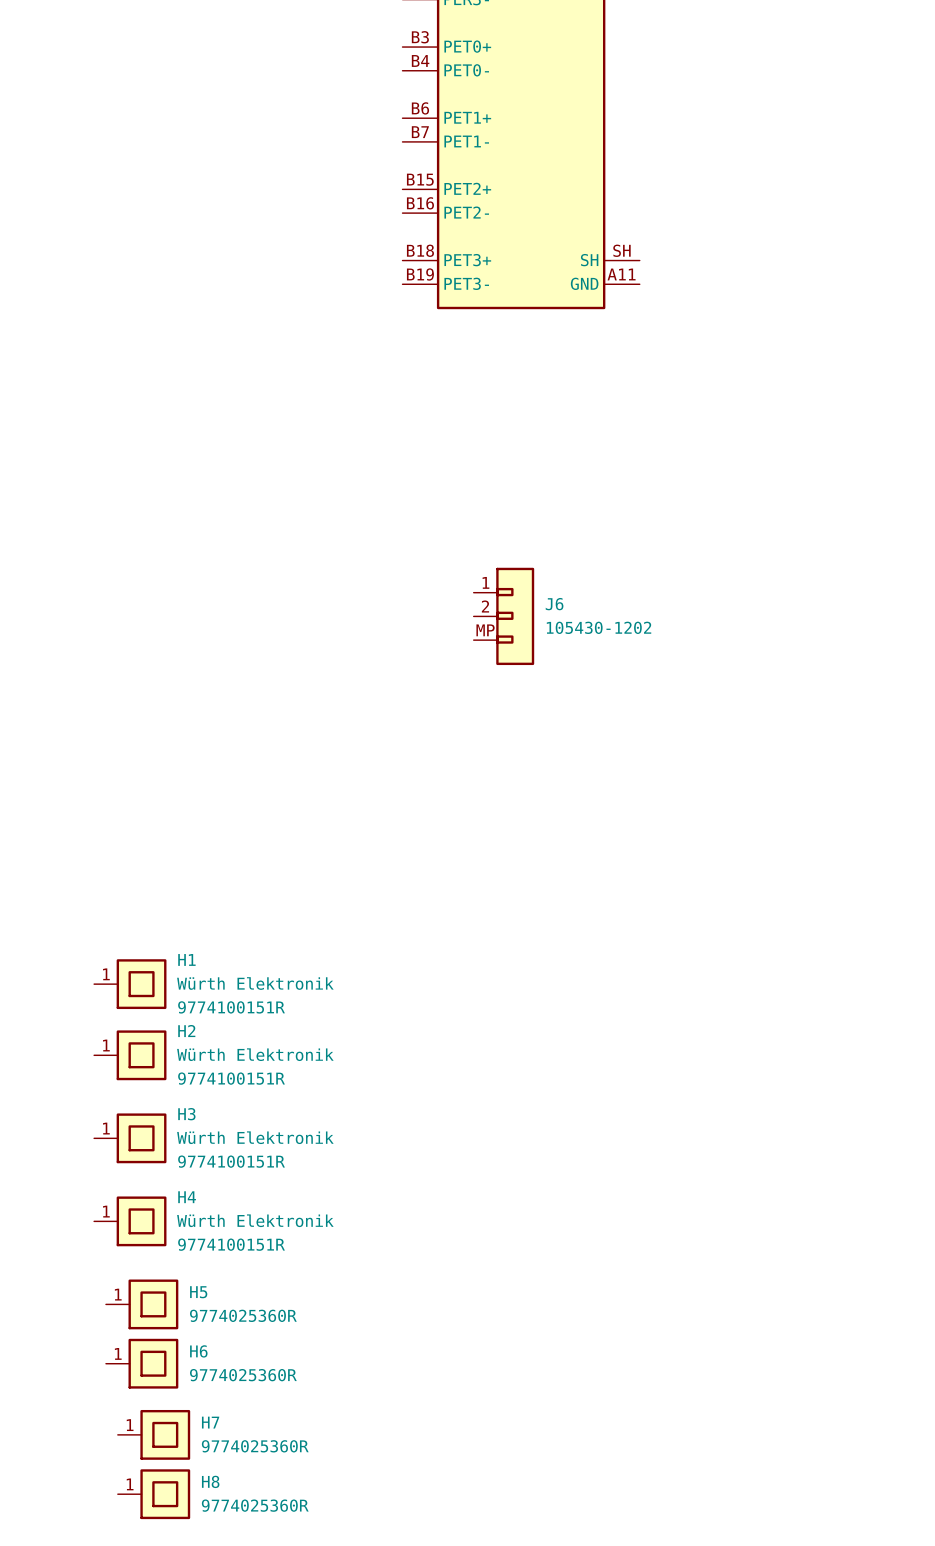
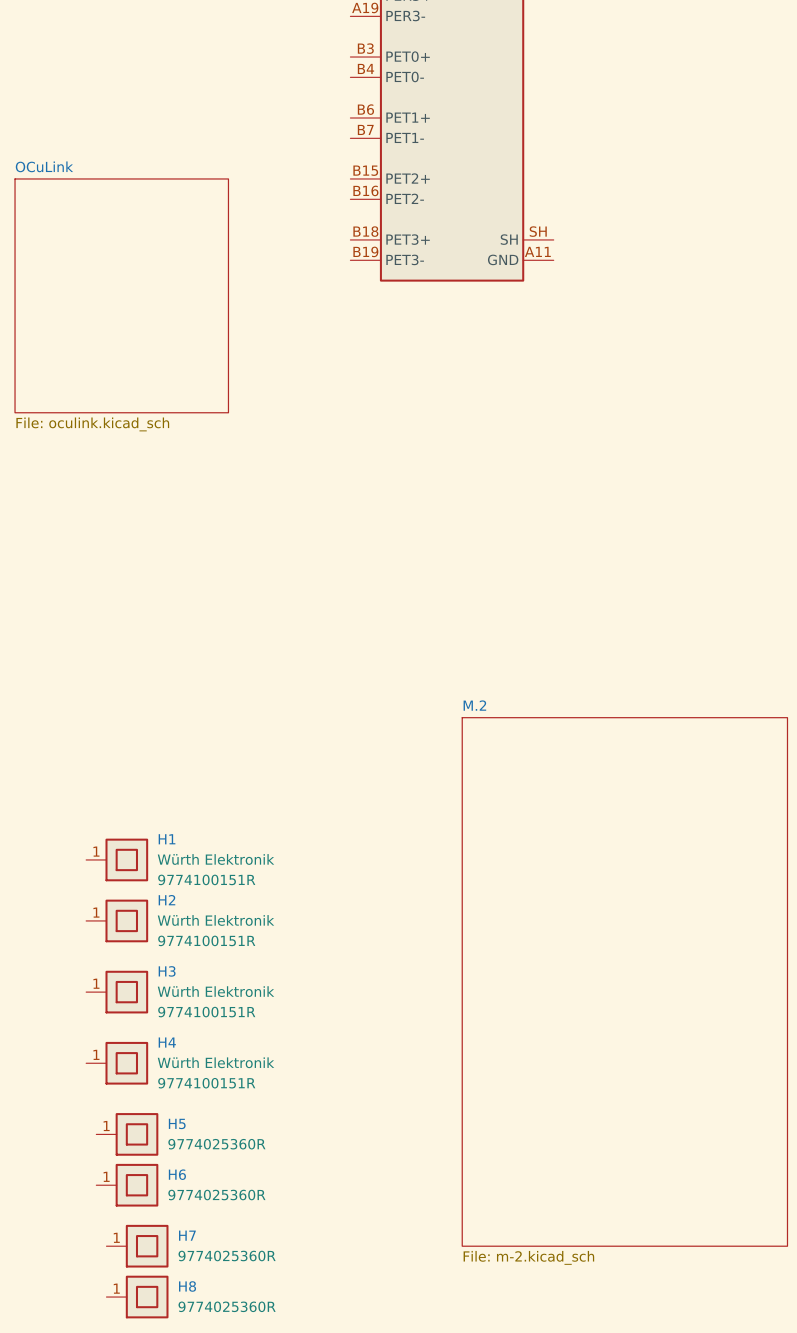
sheet OCuLink: none -> File: oculink.kicad_sch (121, 295)
J6: (503, 616) -> none
sheet M.2: none -> File: m-2.kicad_sch (624, 981)

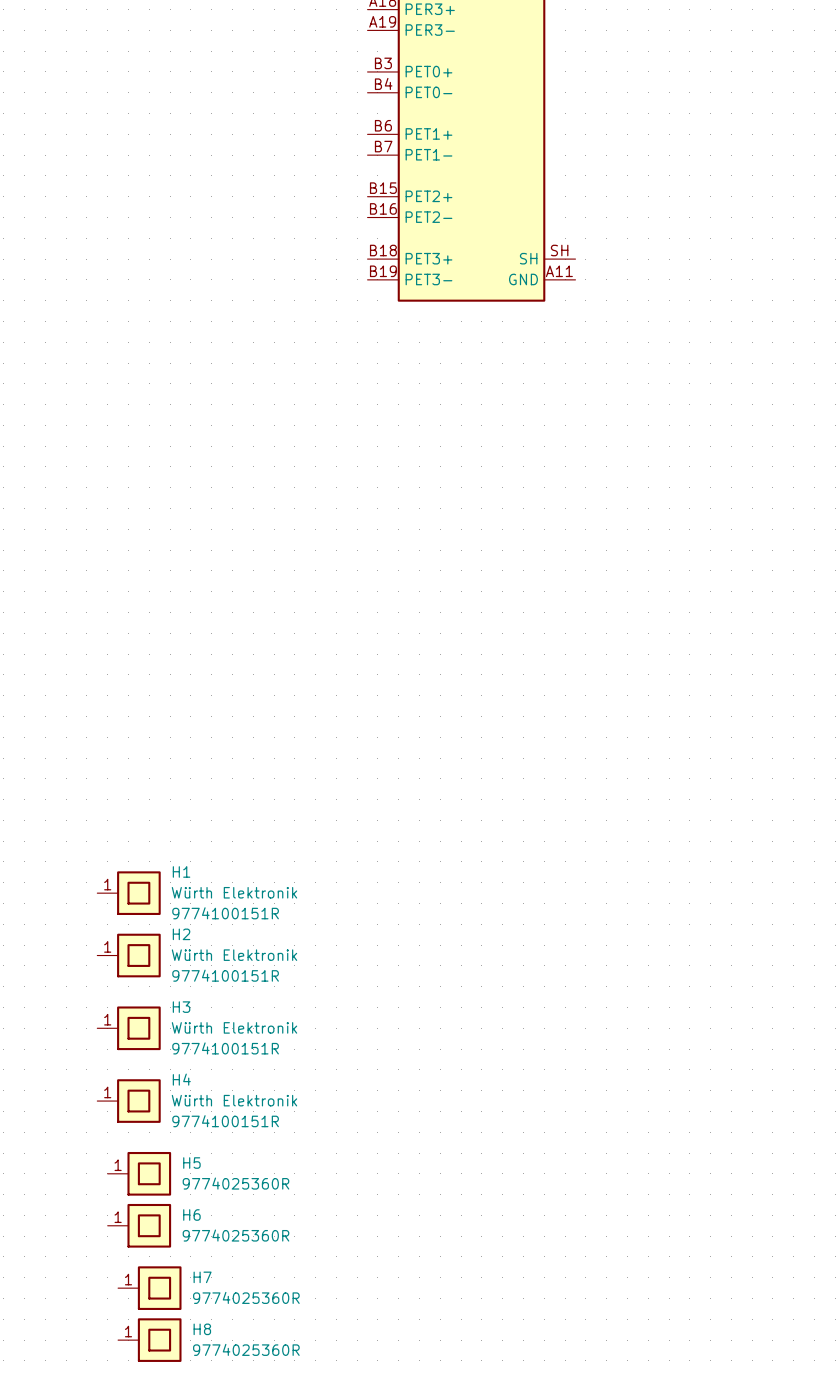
sheet OCuLink: File: oculink.kicad_sch (121, 295) -> none
sheet M.2: File: m-2.kicad_sch (624, 981) -> none

